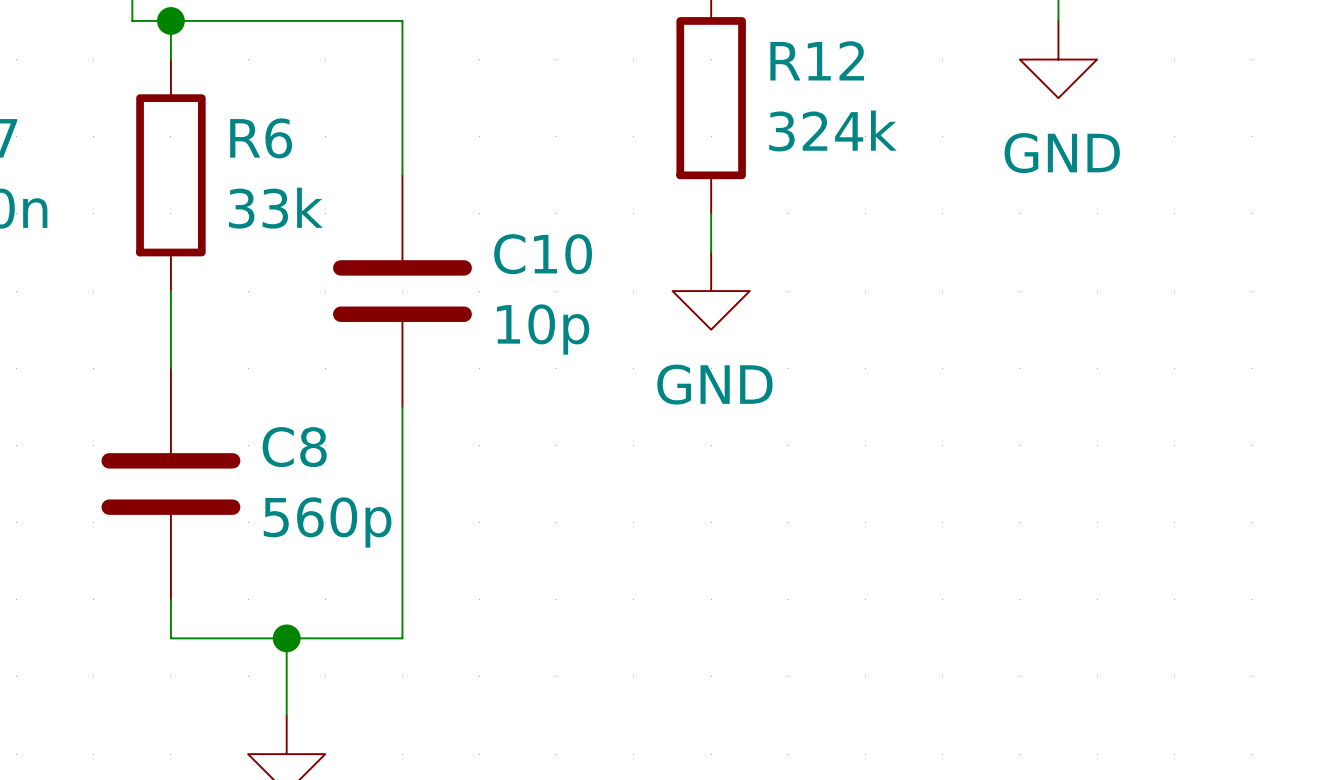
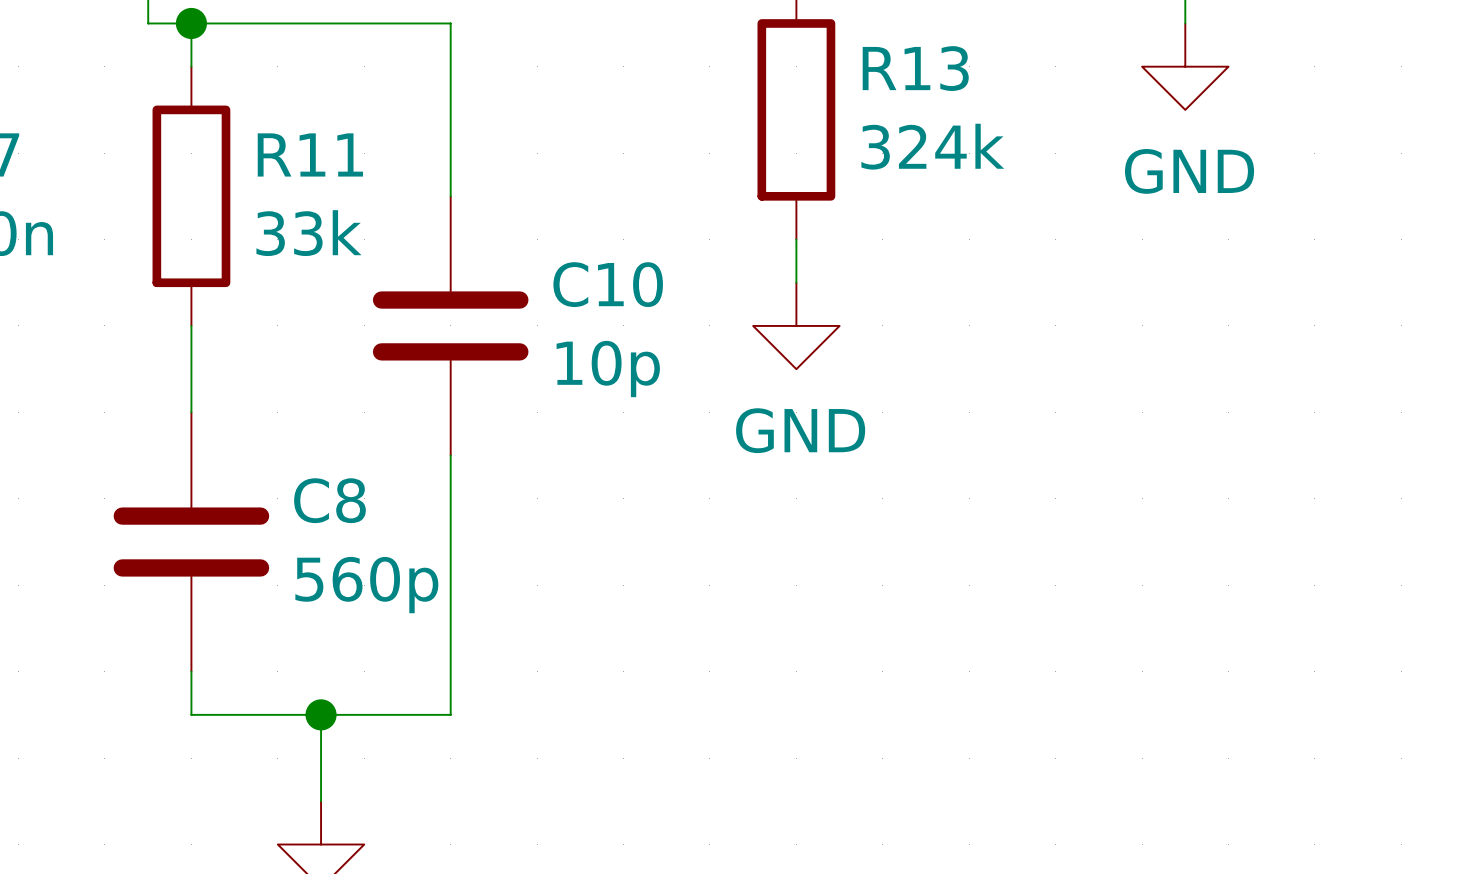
R12 name: R12 (817, 60) -> R13 (915, 68)
R6 name: R6 (261, 138) -> R11 (310, 154)

